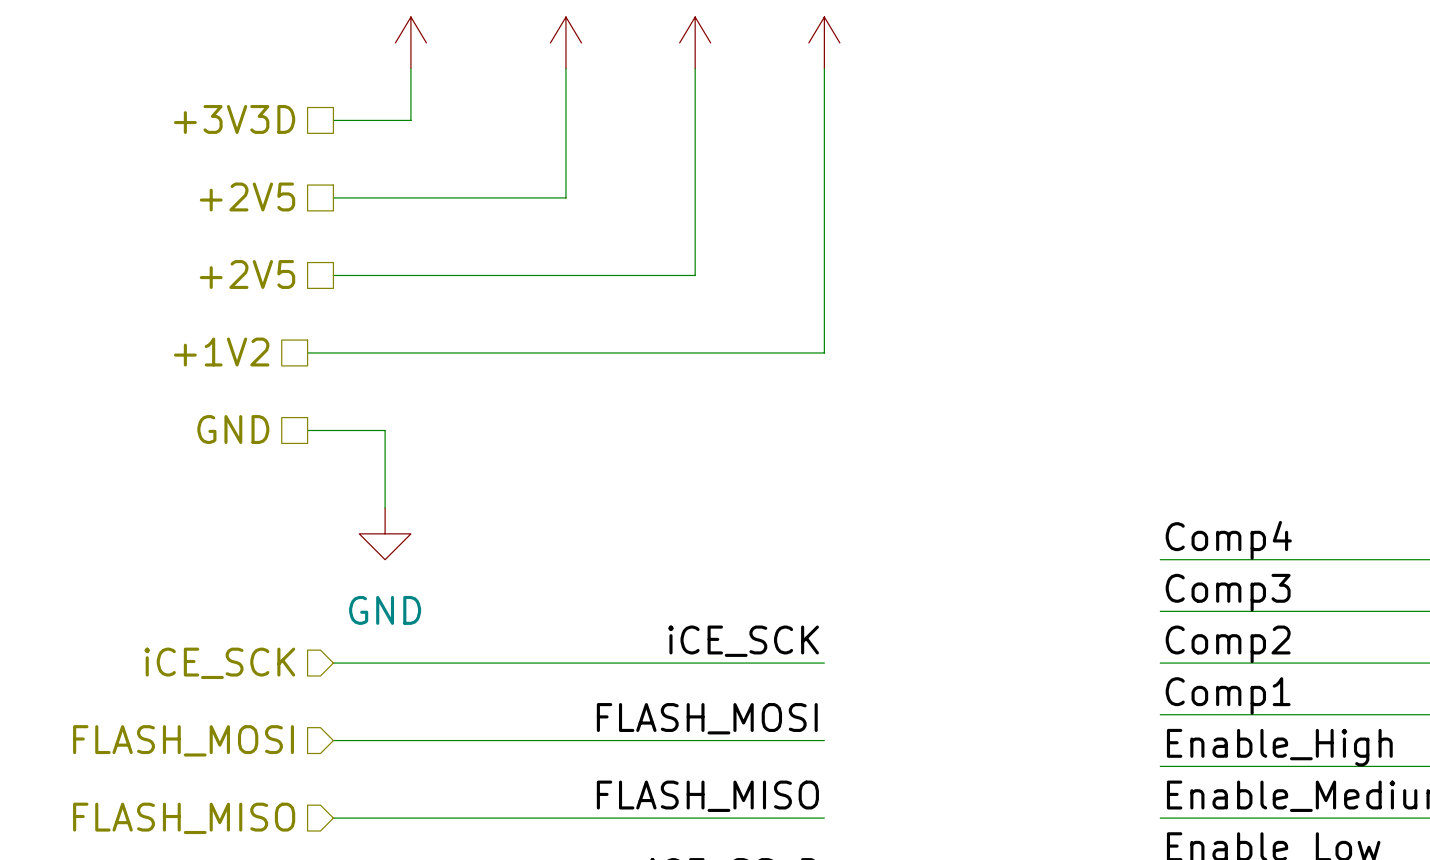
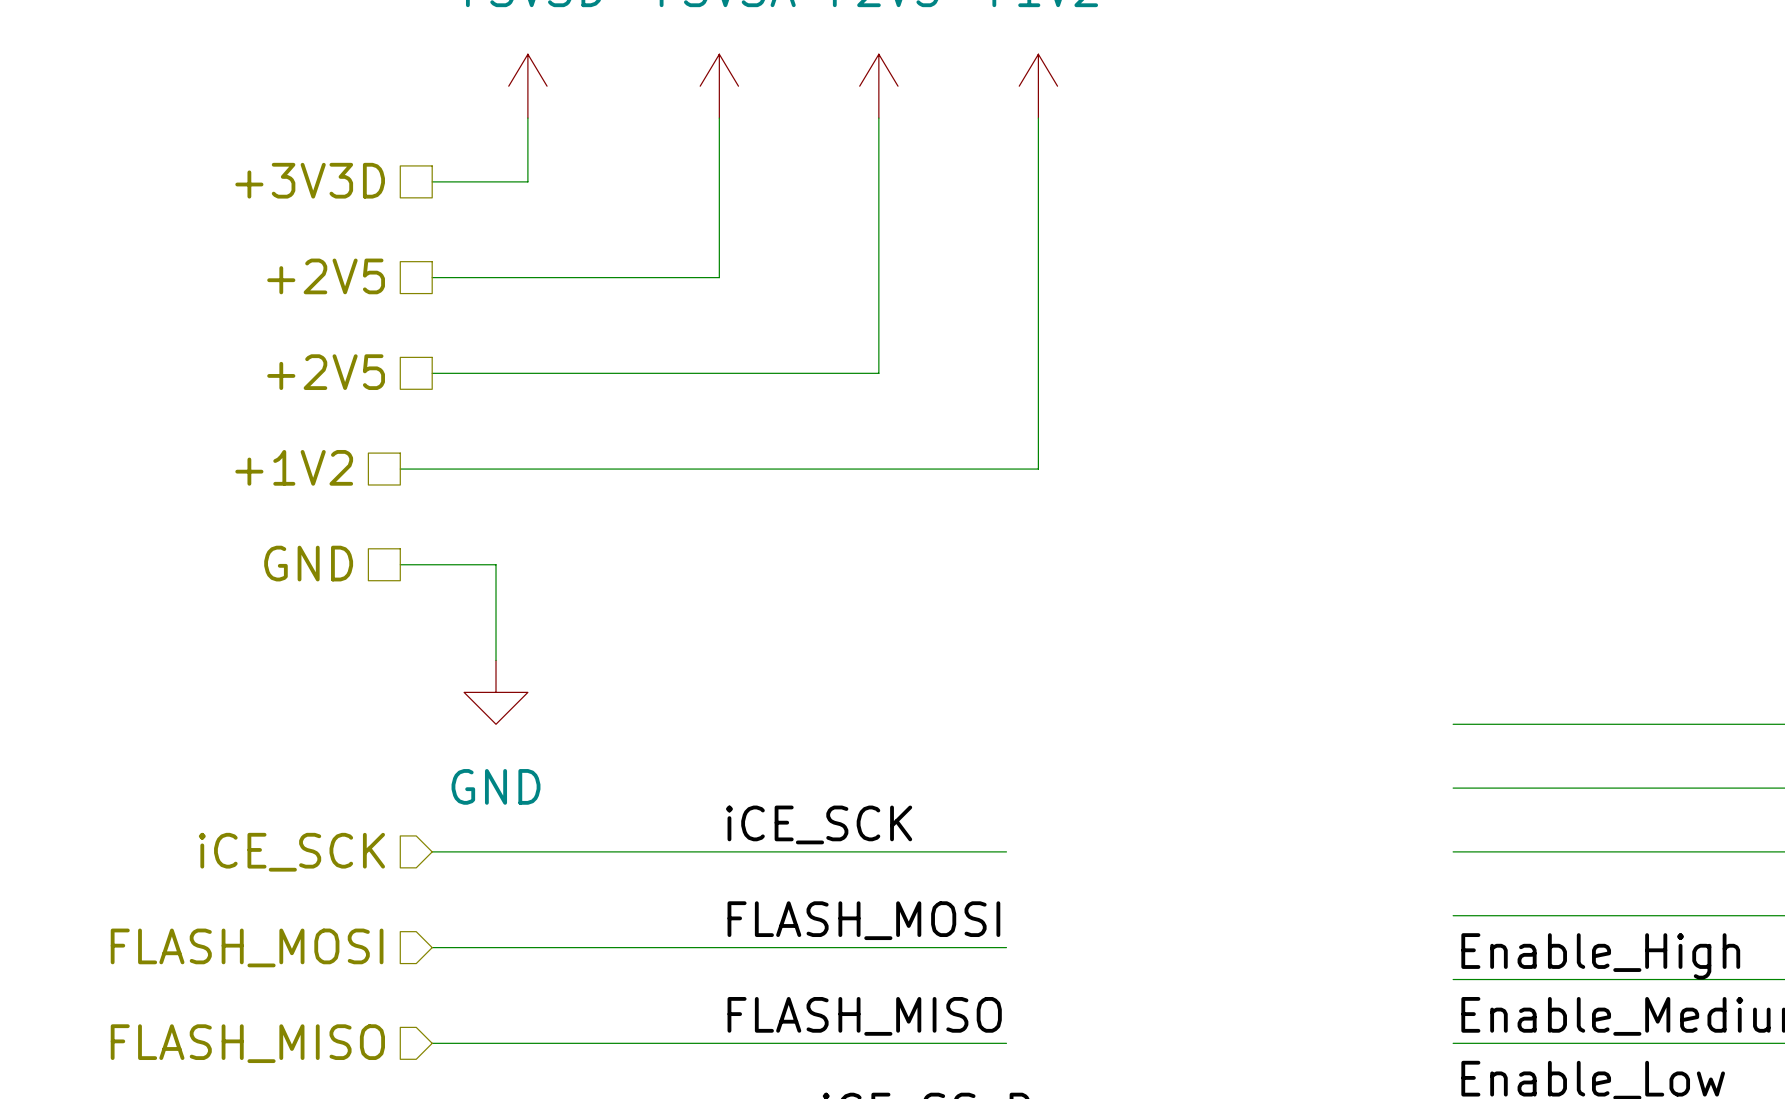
label: Comp4 (1228, 540) -> none
label: Comp3 (1228, 592) -> none
label position: iCE_SCK (743, 641) -> iCE_SCK (819, 824)
label: Comp2 (1228, 644) -> none
wire: (798, 663) (824, 663) -> none
label: Comp1 (1228, 695) -> none
label position: FLASH_MOSI (707, 718) -> FLASH_MOSI (863, 920)
wire: (798, 740) (824, 740) -> none
label position: FLASH_MISO (707, 796) -> FLASH_MISO (864, 1016)
wire: (798, 818) (824, 818) -> none

